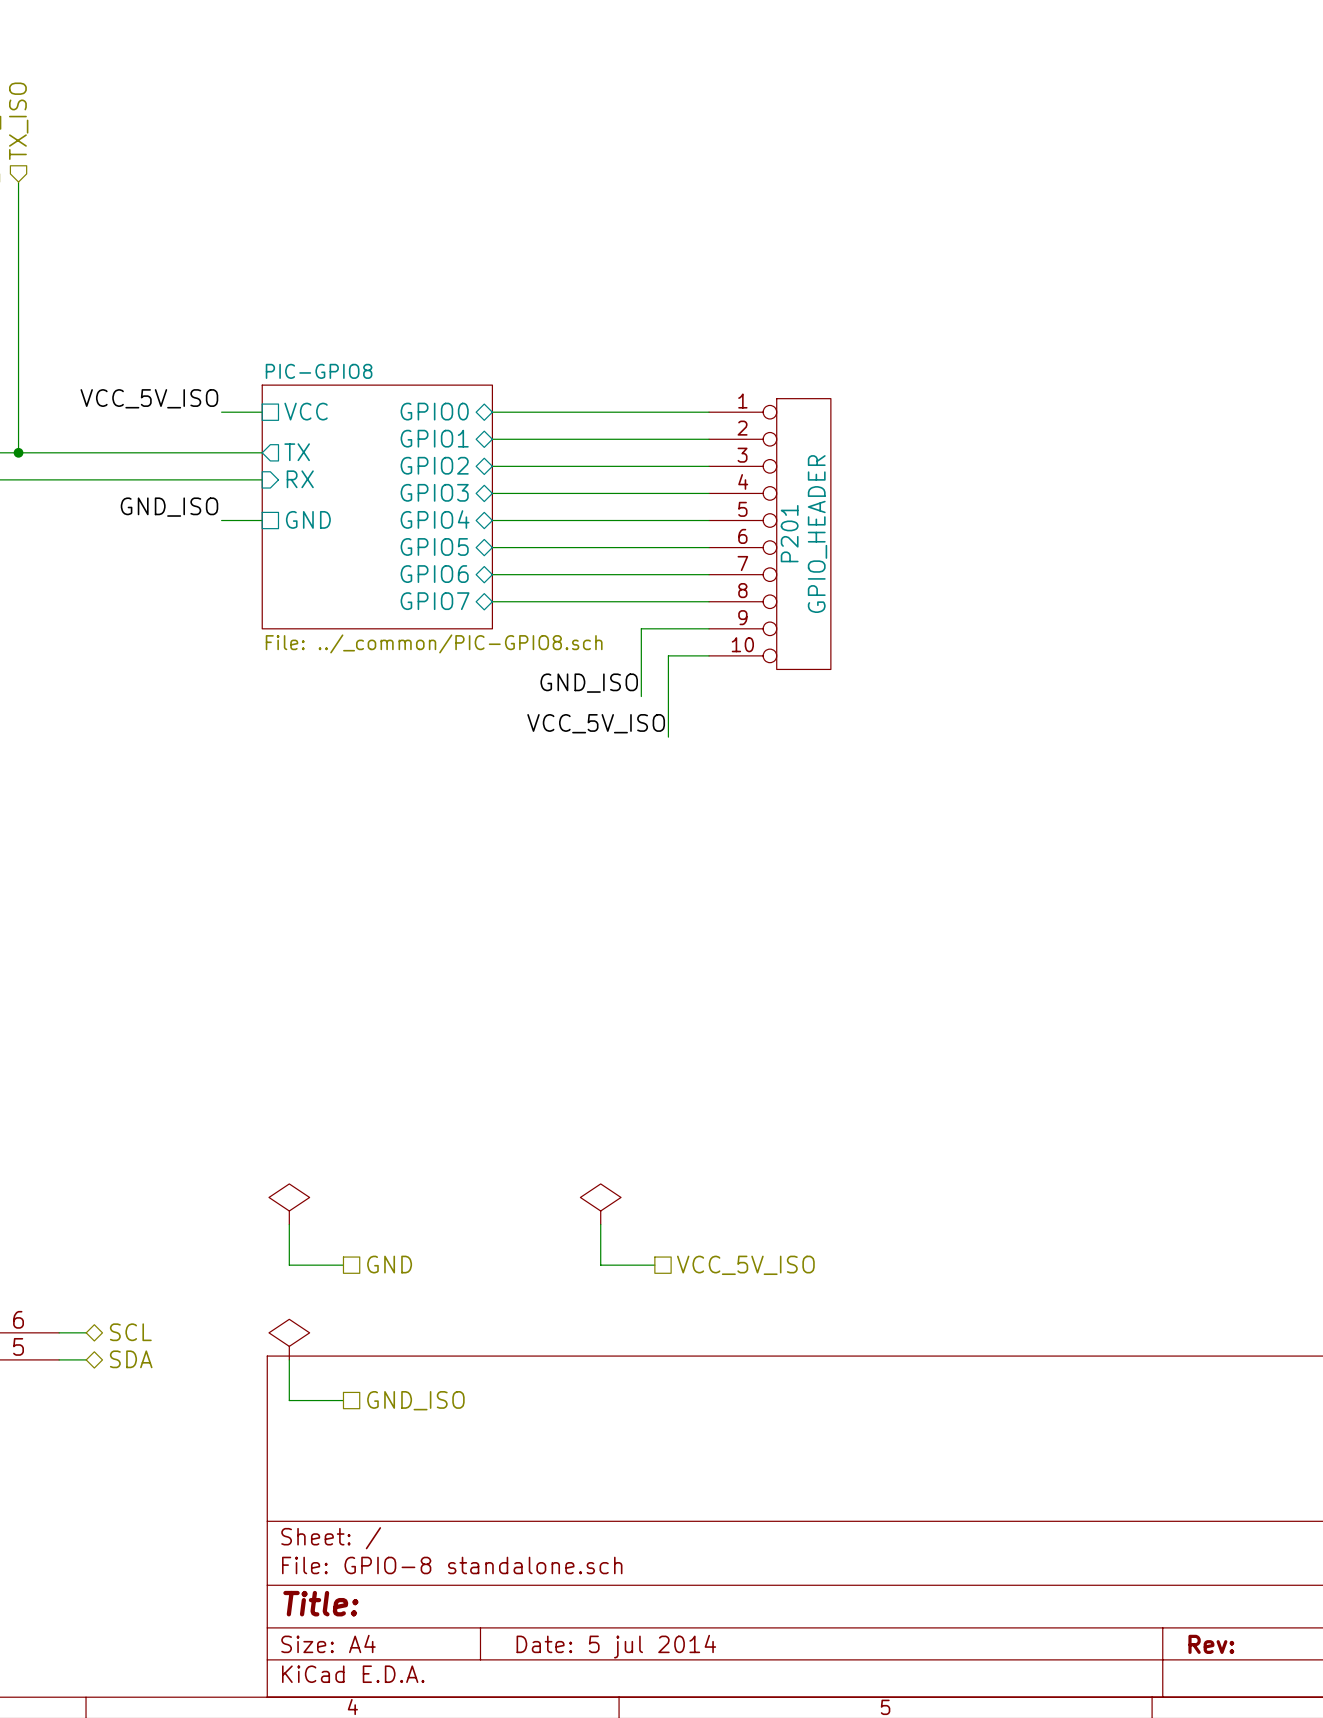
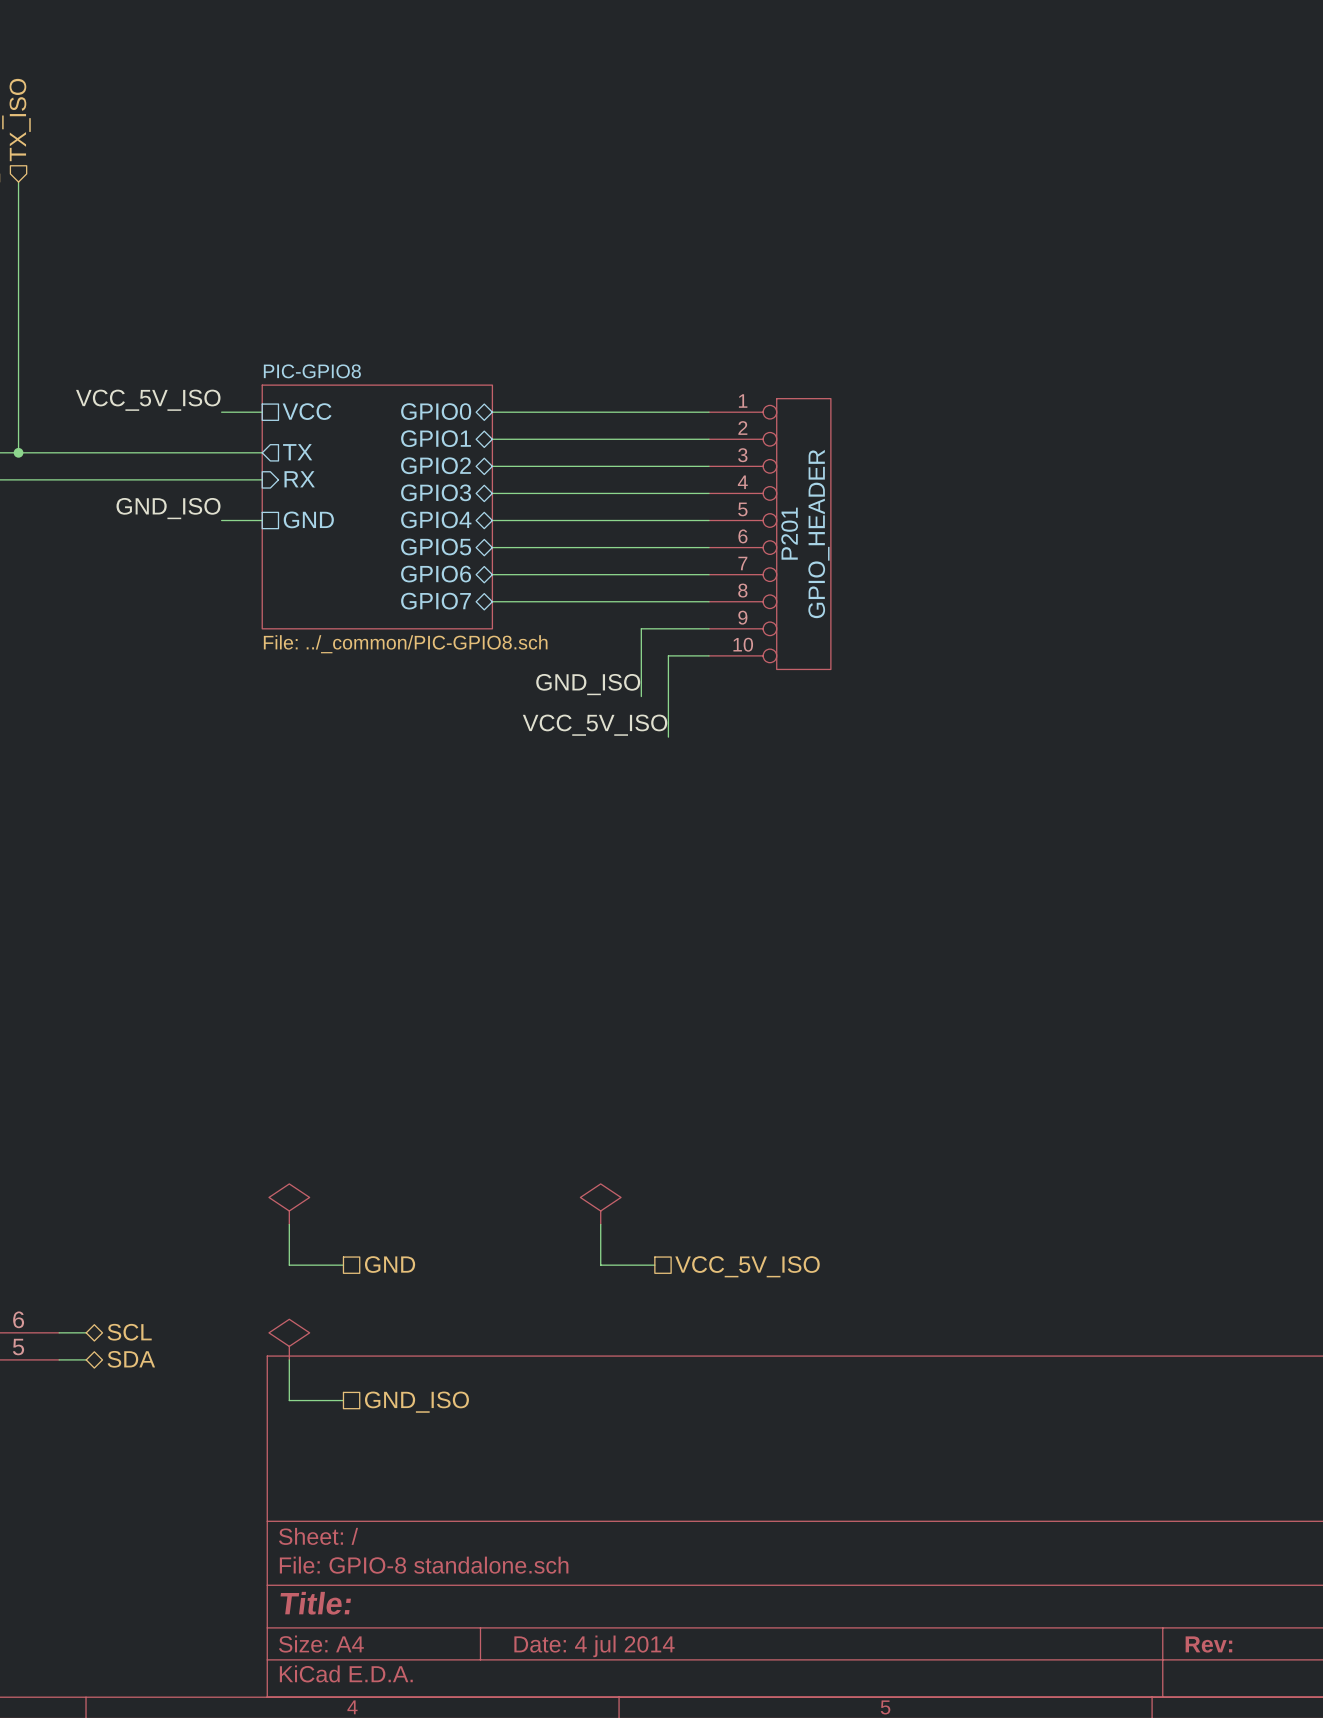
title block: Date: 5 jul 2014 (616, 1646) -> Date: 4 jul 2014 (594, 1646)

